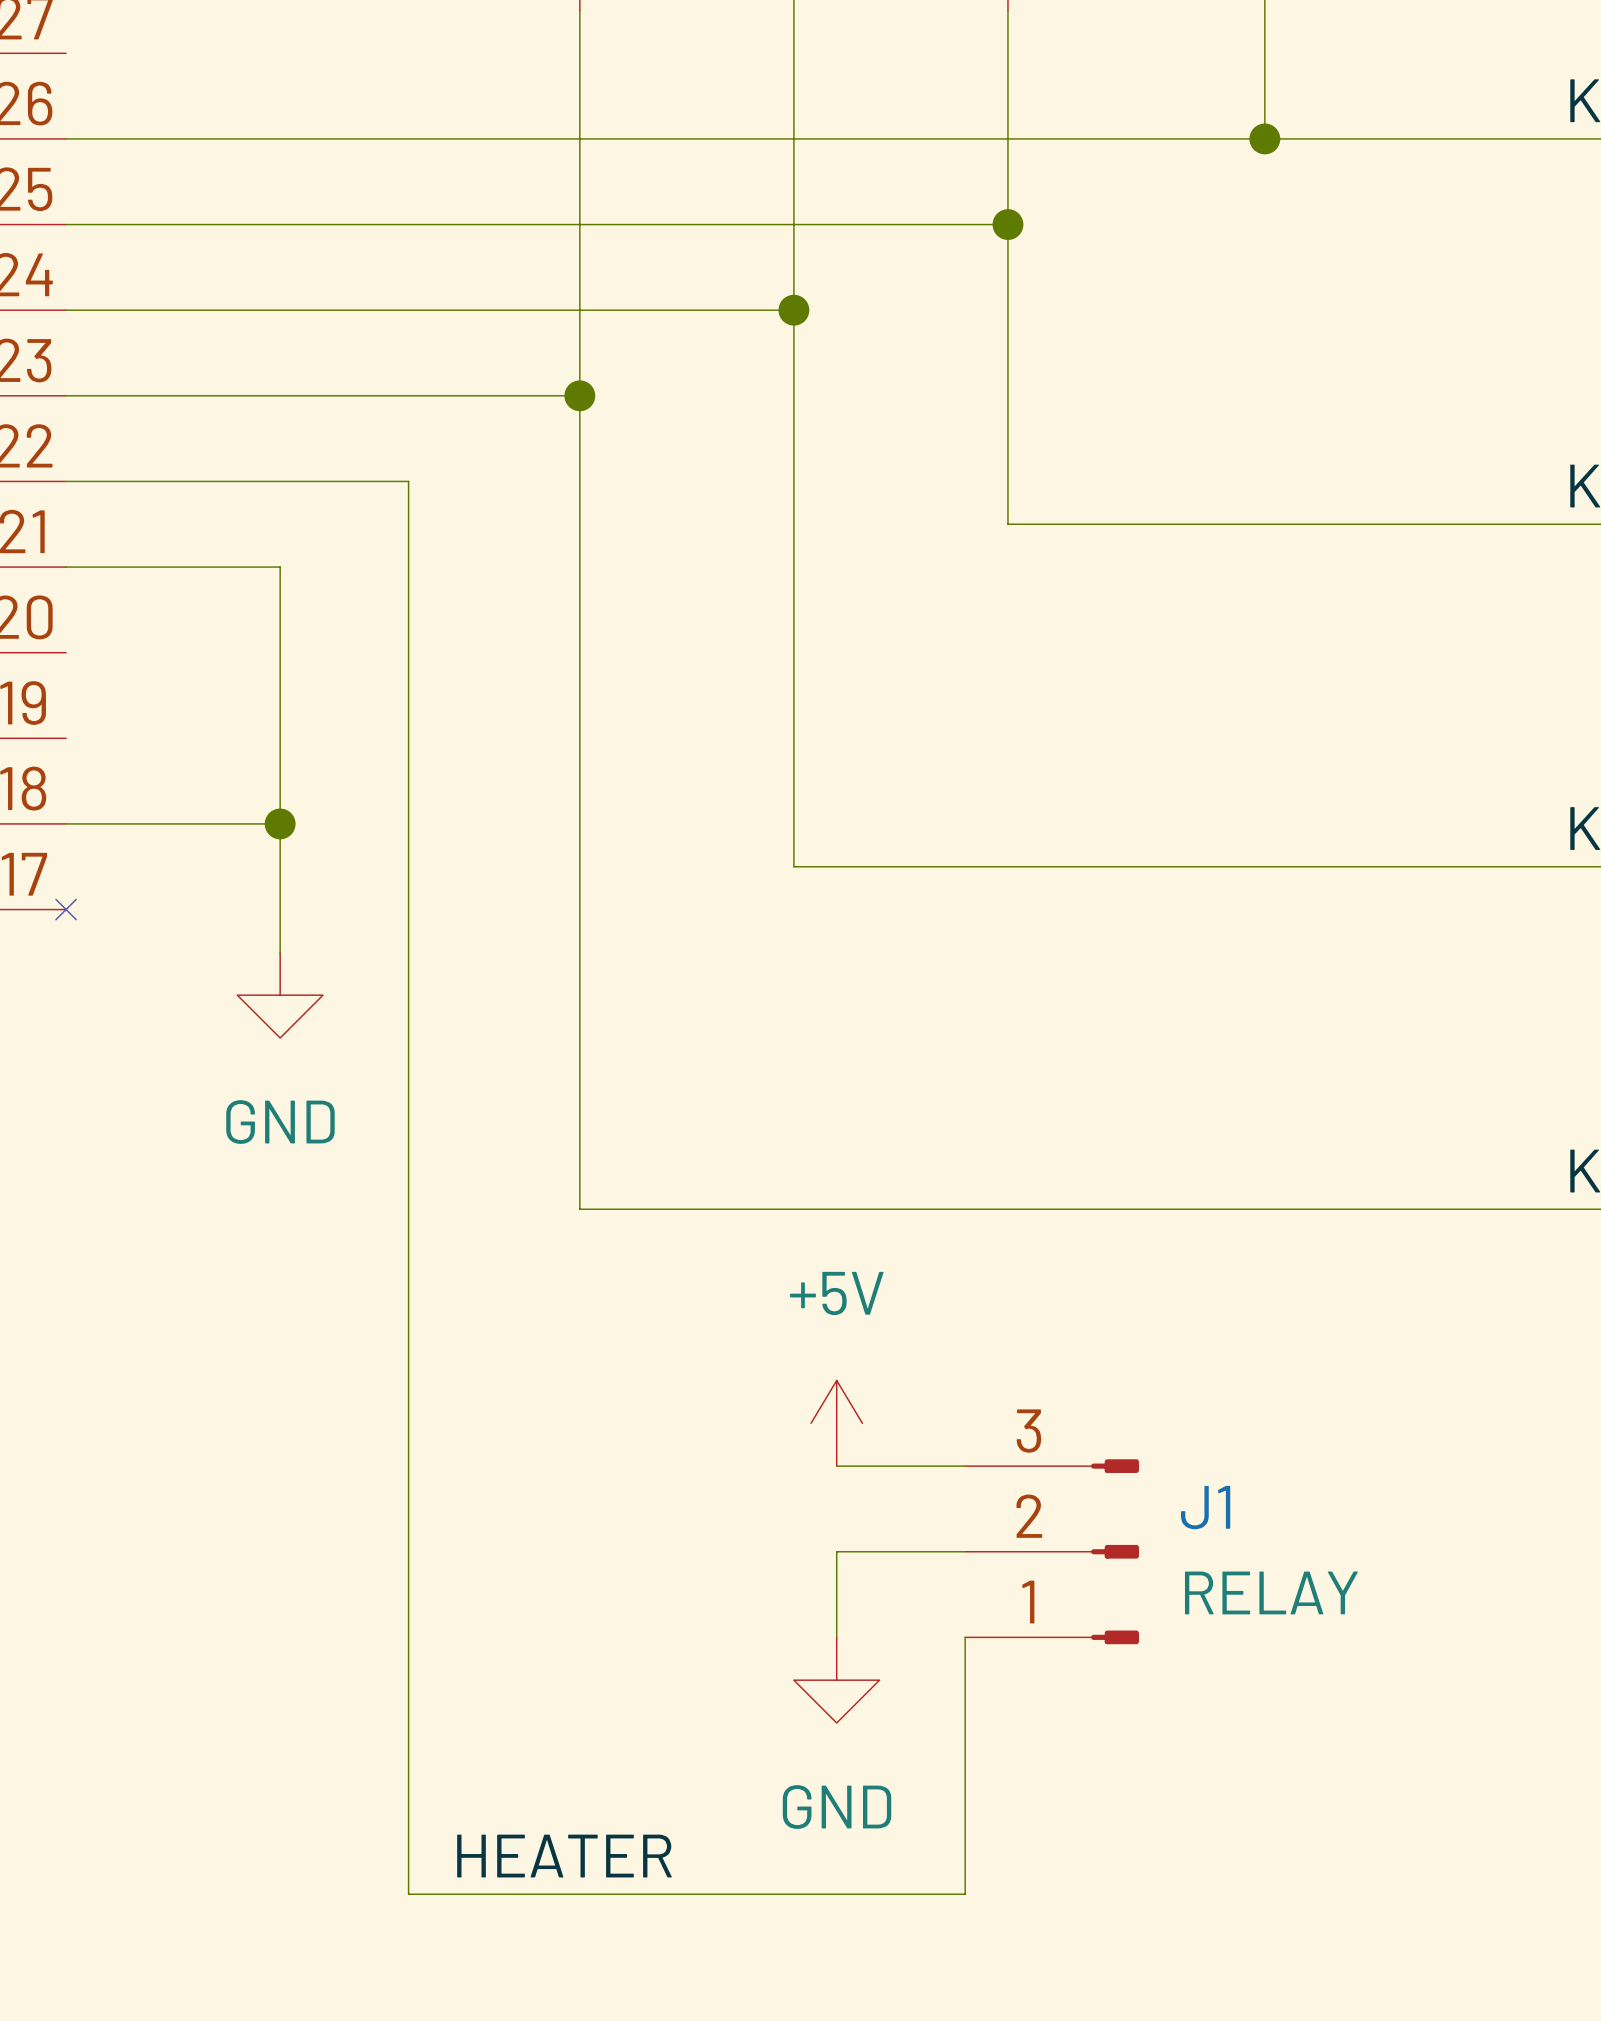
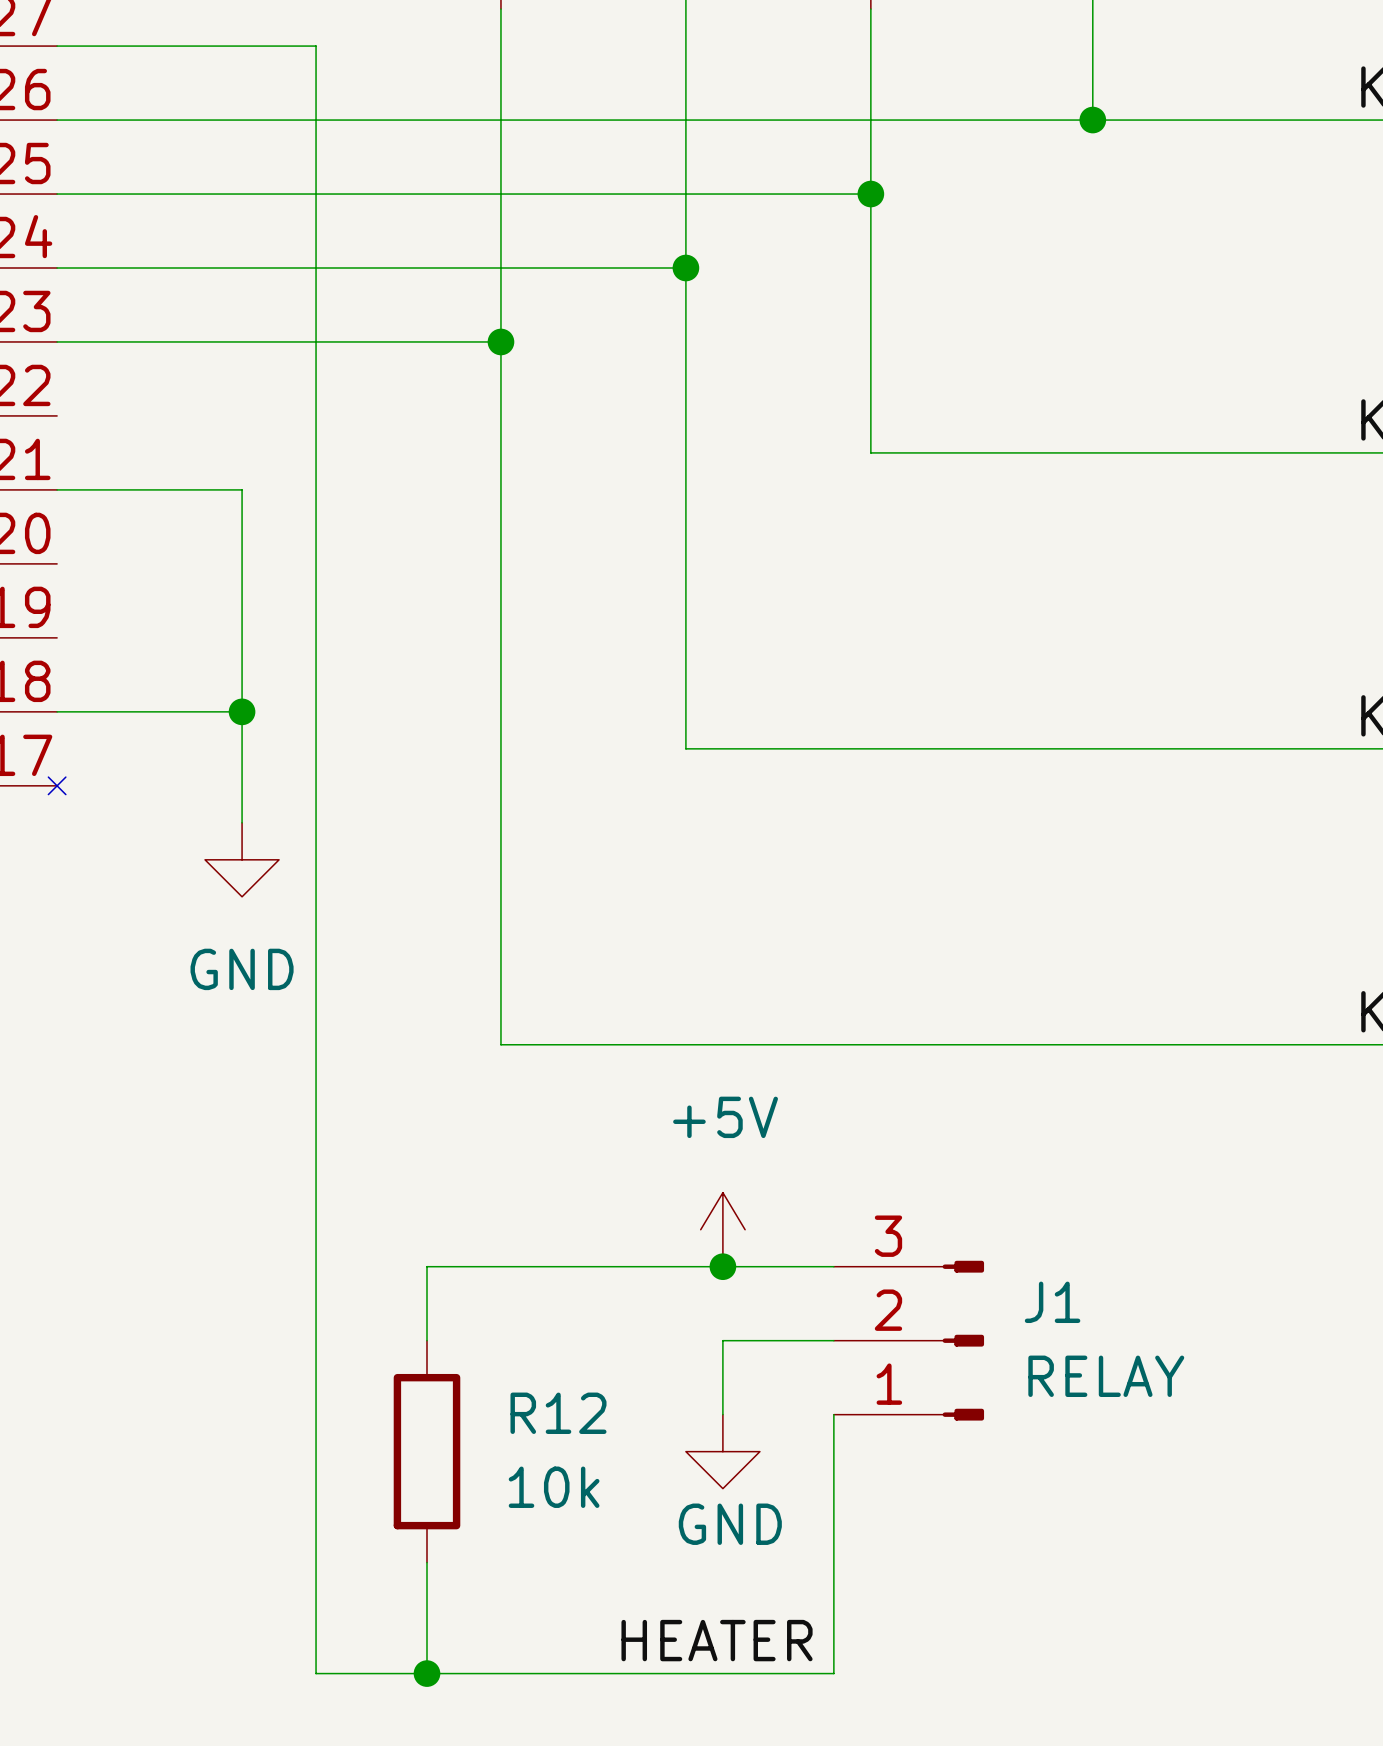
wire: (66, 481) (408, 481) (408, 1894) (965, 1894) -> (57, 46) (316, 46) (316, 1673) (833, 1673) (833, 1636)
wire: none -> (722, 1266) (426, 1266) (426, 1340)
junction: none -> (722, 1266)
R12: none -> 10k (426, 1451)
power symbol text position: GND (837, 1807) -> GND (730, 1524)
wire: none -> (426, 1562) (426, 1673)
label position: HEATER (564, 1856) -> HEATER (717, 1640)
junction: none -> (426, 1673)

